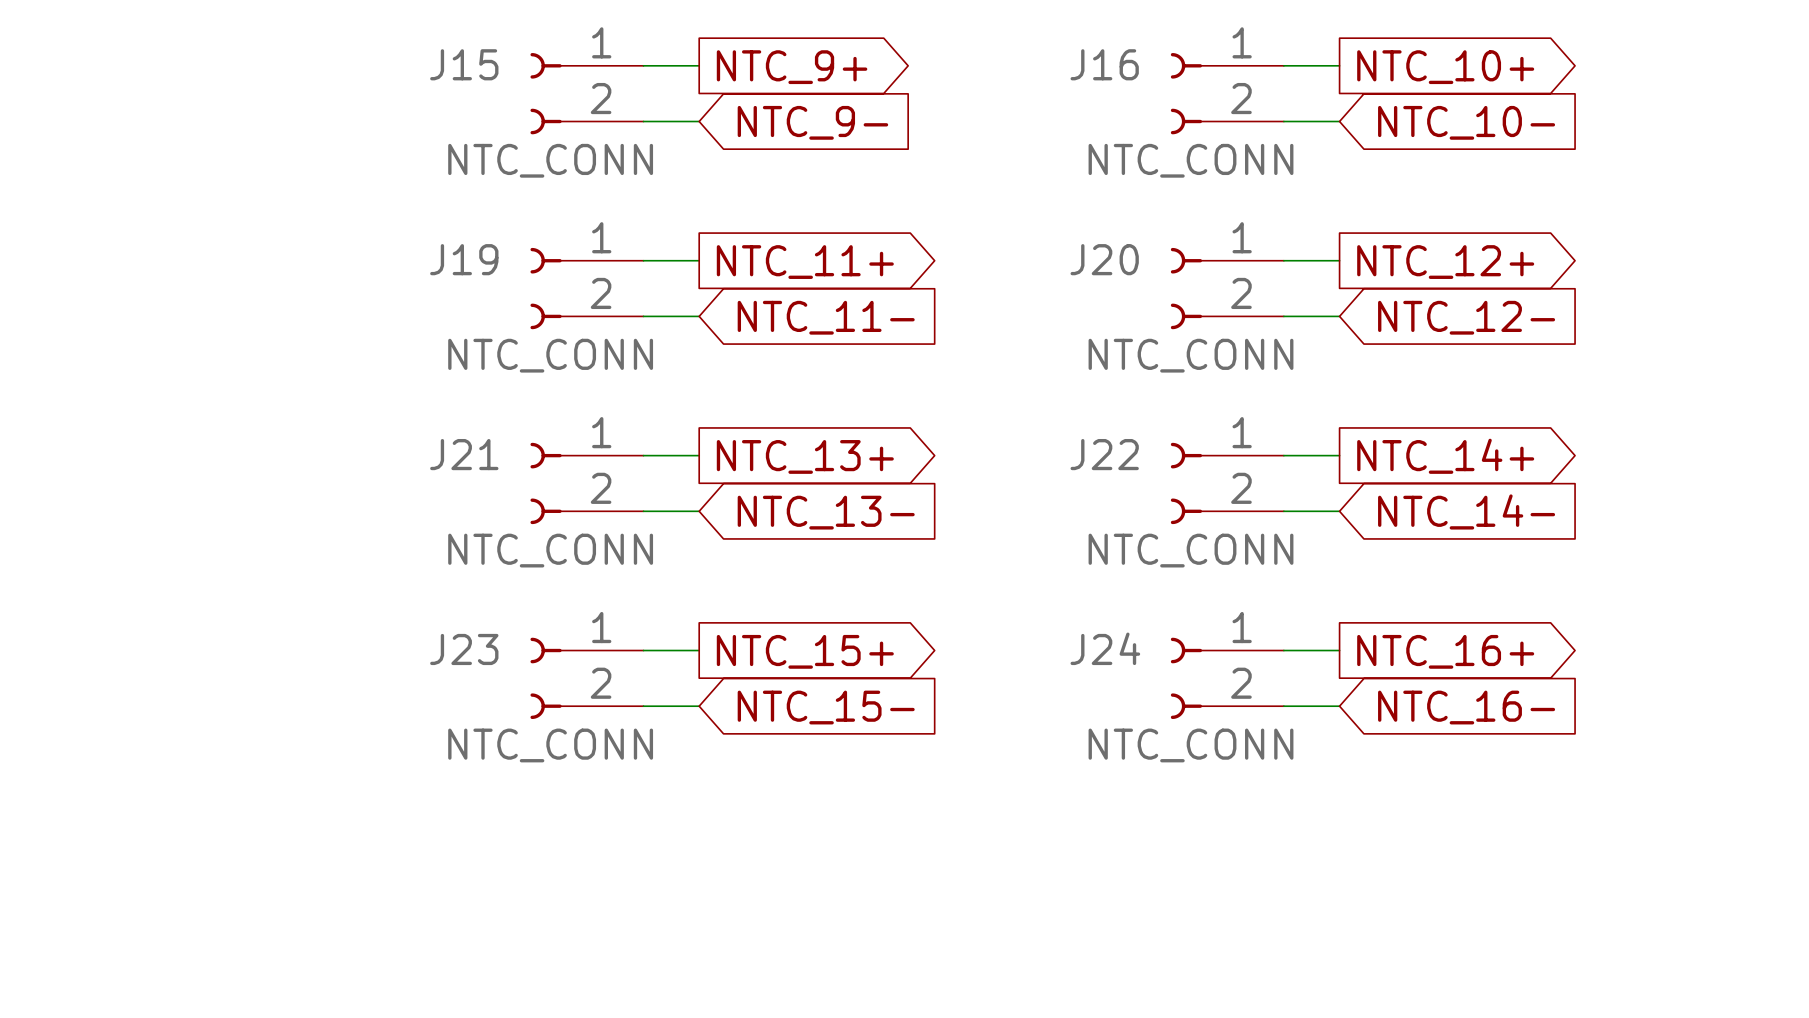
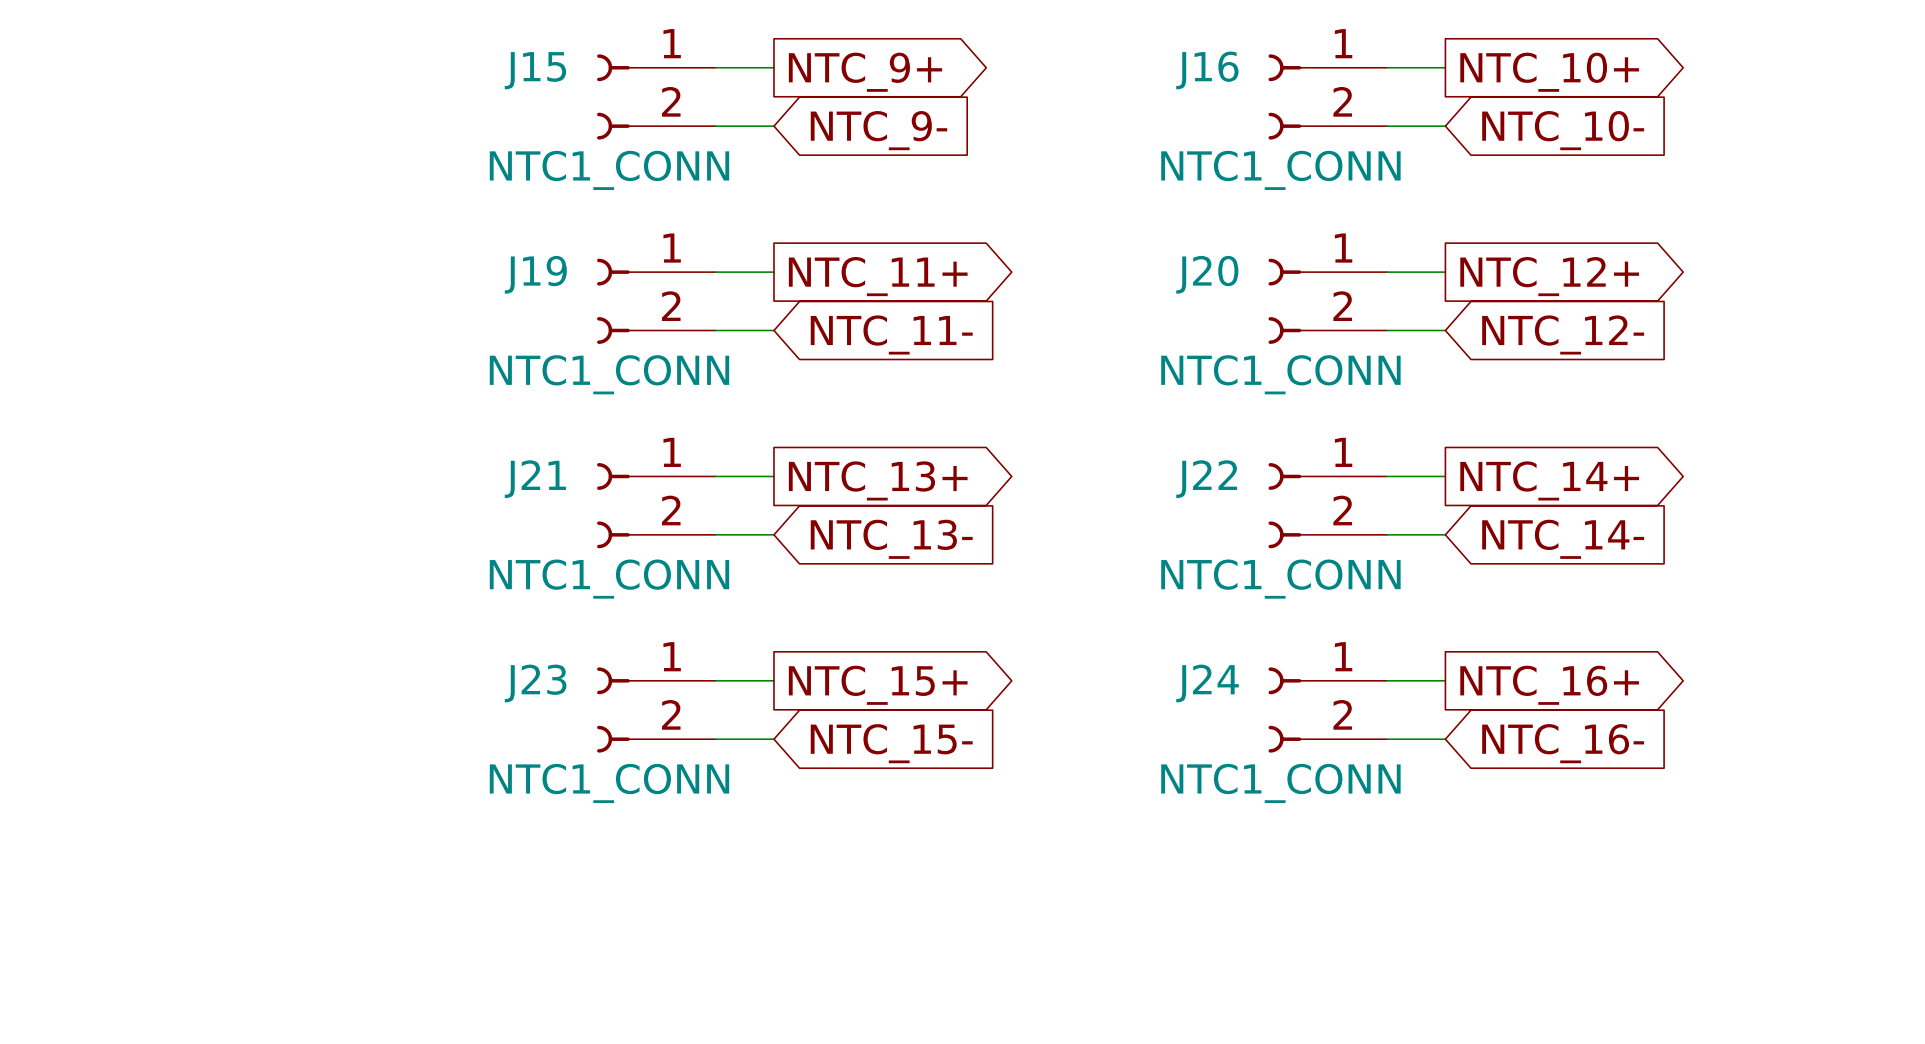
J15 value: NTC_CONN (550, 160) -> NTC1_CONN (609, 170)
J16 value: NTC_CONN (1191, 160) -> NTC1_CONN (1280, 170)
J19 value: NTC_CONN (550, 355) -> NTC1_CONN (609, 374)
J20 value: NTC_CONN (1191, 355) -> NTC1_CONN (1280, 374)
J21 value: NTC_CONN (550, 550) -> NTC1_CONN (609, 579)
J22 value: NTC_CONN (1191, 550) -> NTC1_CONN (1280, 579)
J23 value: NTC_CONN (550, 745) -> NTC1_CONN (609, 783)
J24 value: NTC_CONN (1191, 745) -> NTC1_CONN (1280, 783)

